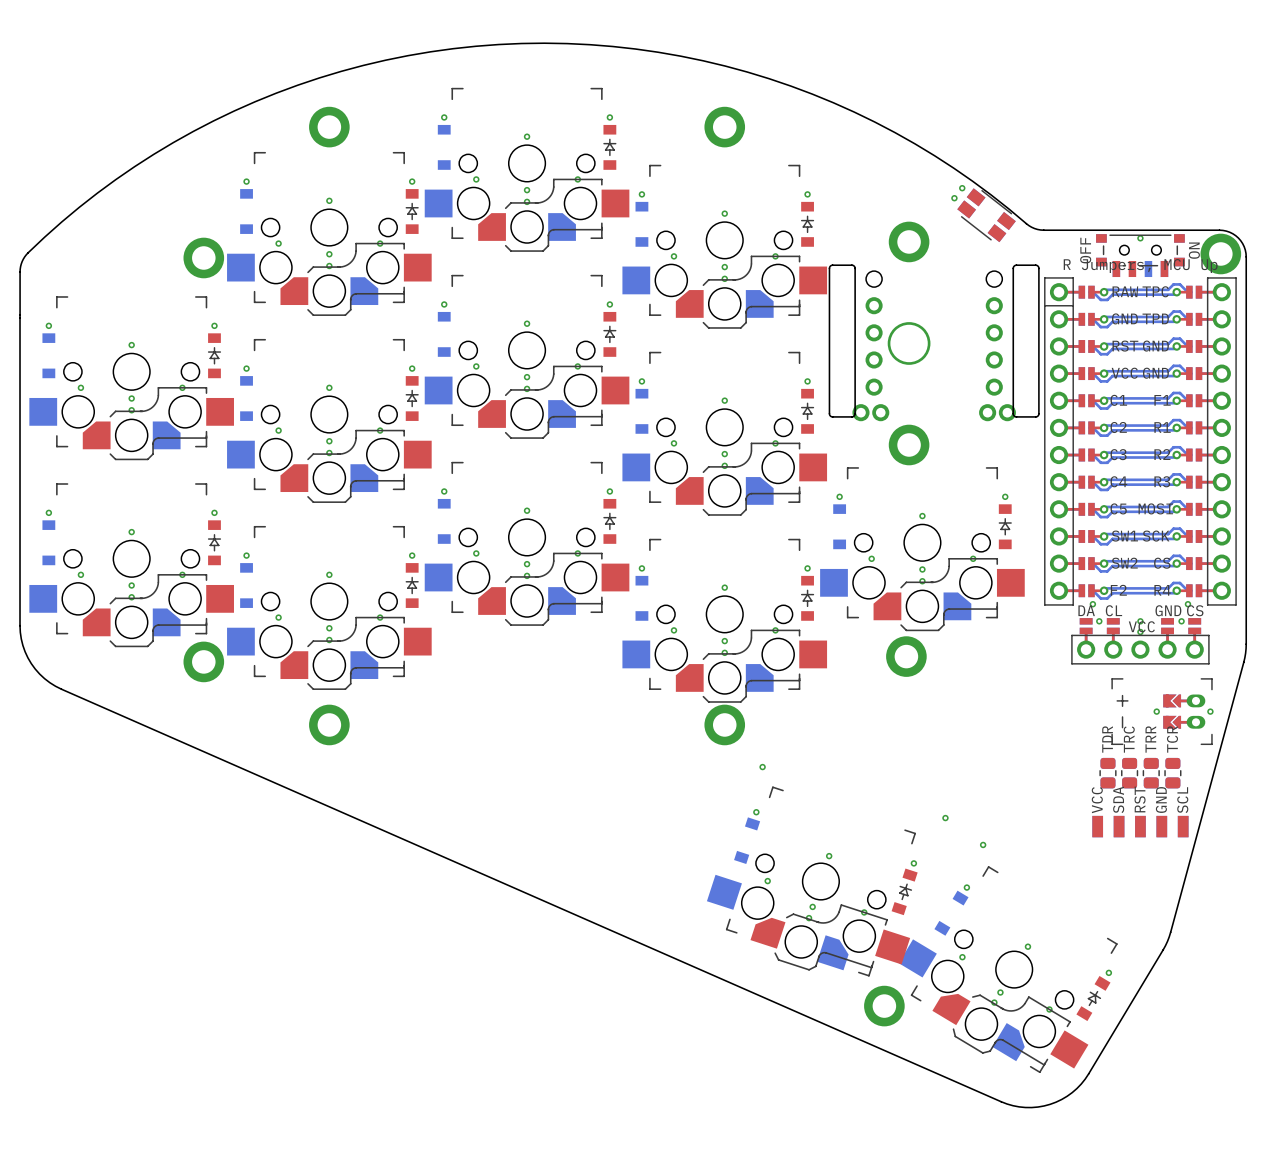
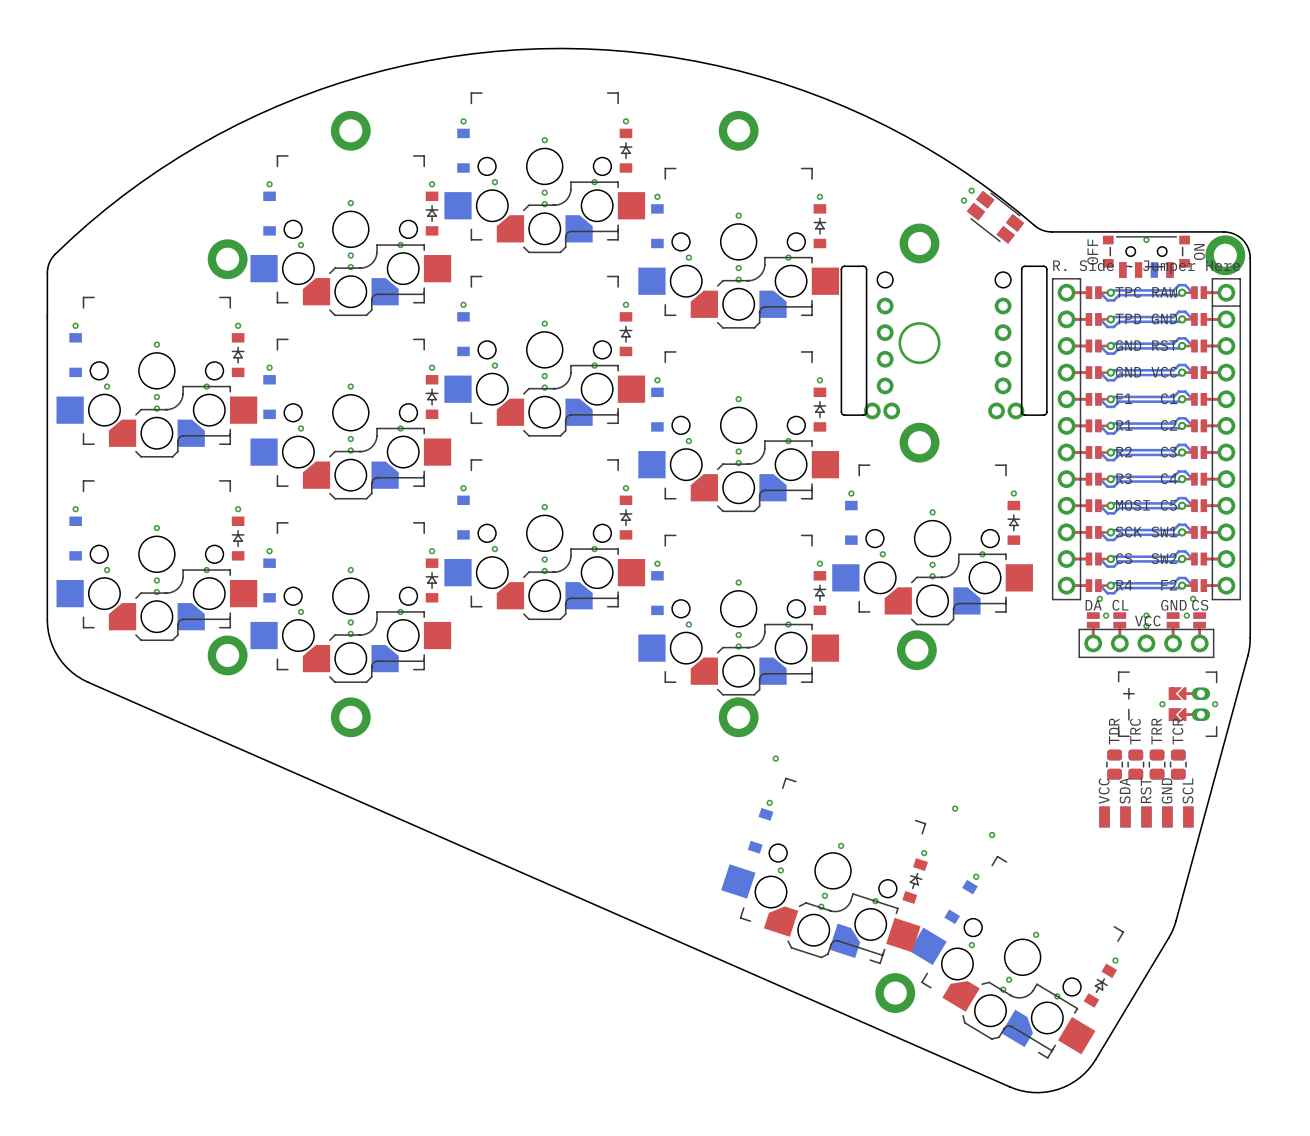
part footprint: [1044, 277, 1237, 606] -> [1052, 278, 1241, 601]

